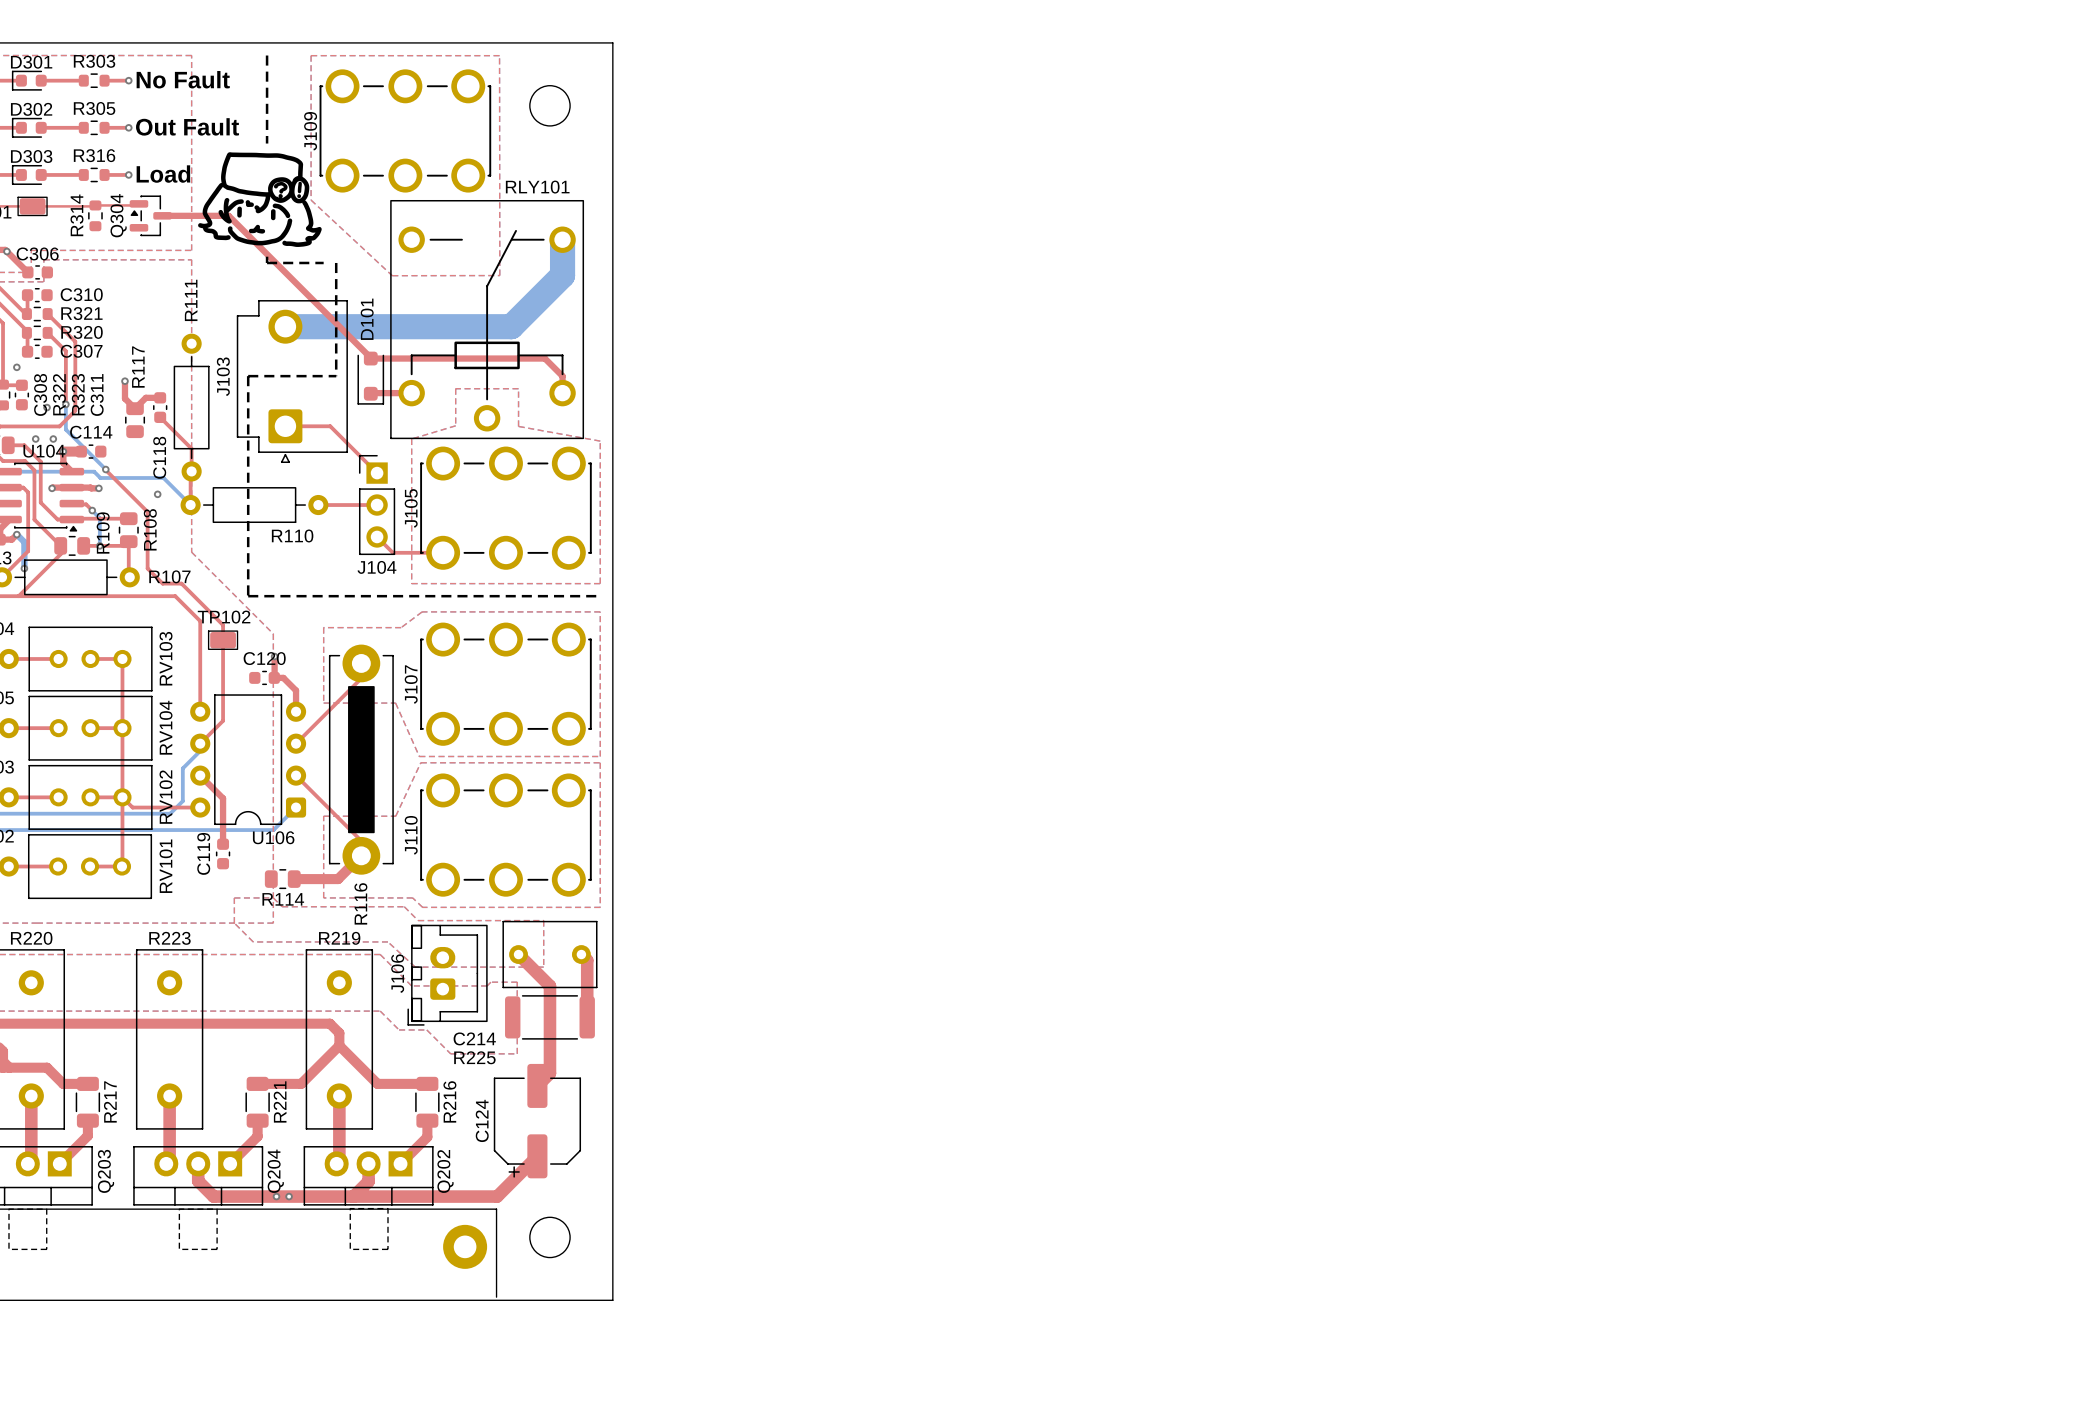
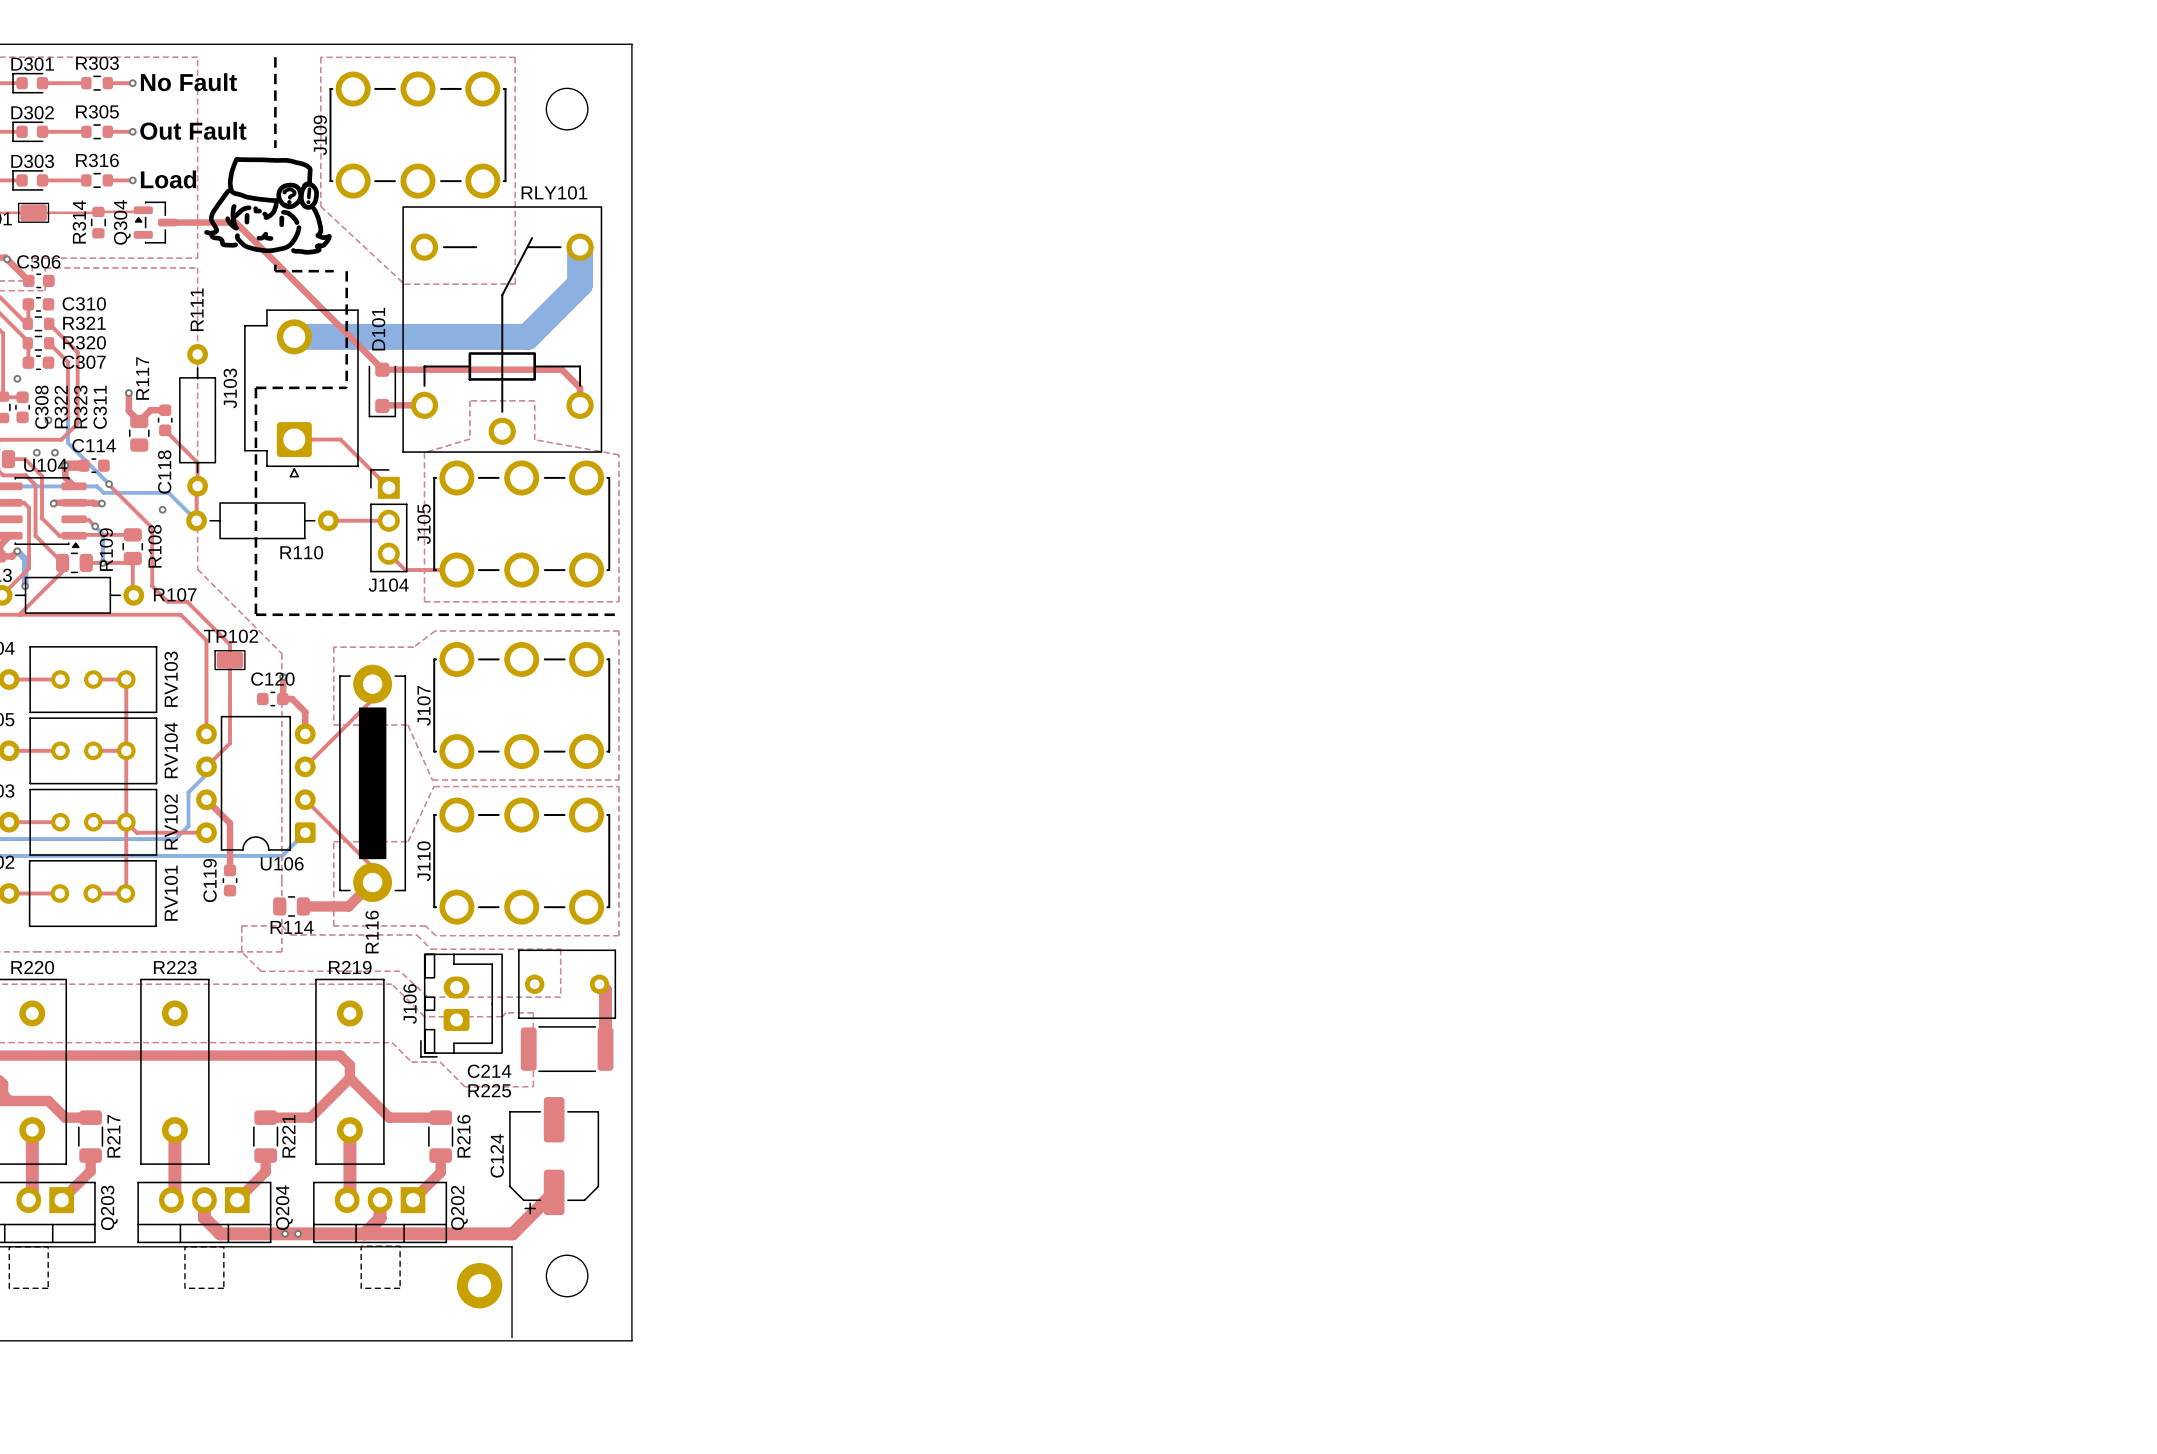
via: (65, 404) -> none
top track: (518, 954) (549, 985) (549, 1073) (537, 1085) -> none

